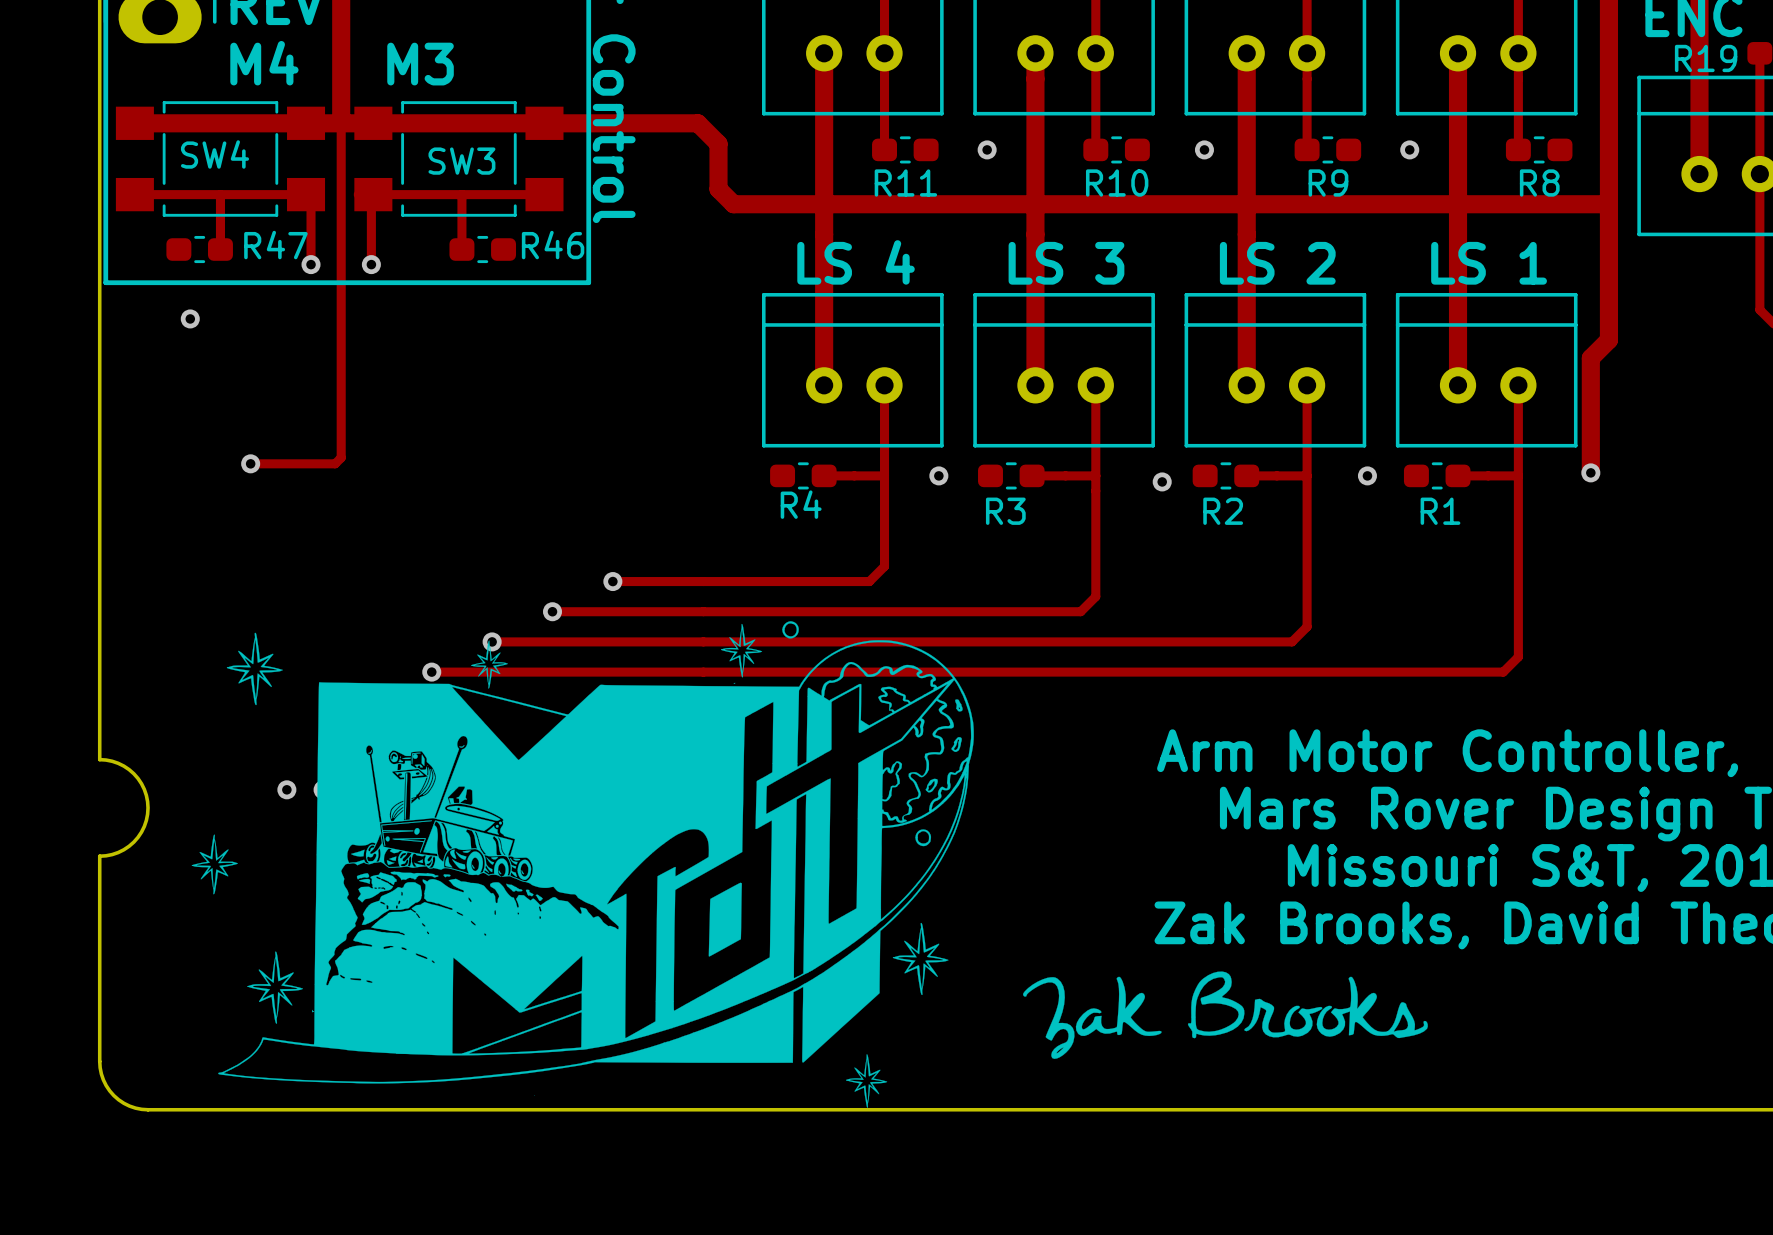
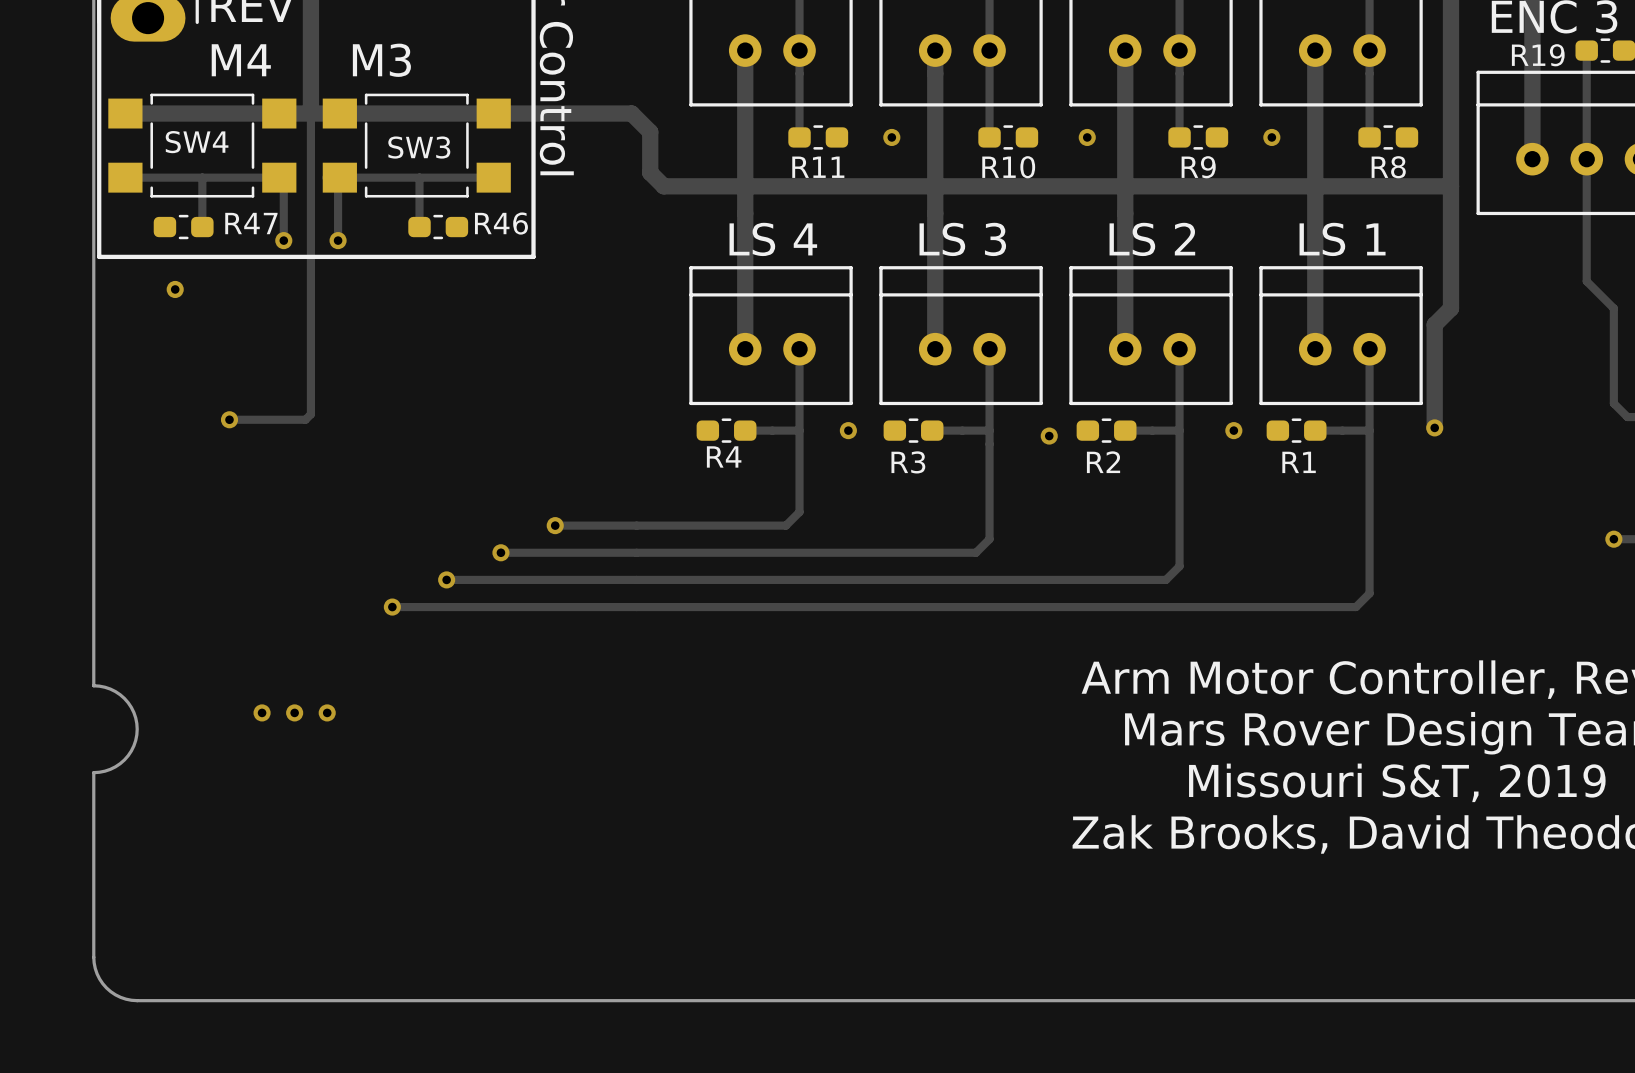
drawing: [191, 621, 974, 1108] -> none
drawing: [1022, 971, 1428, 1059] -> none

